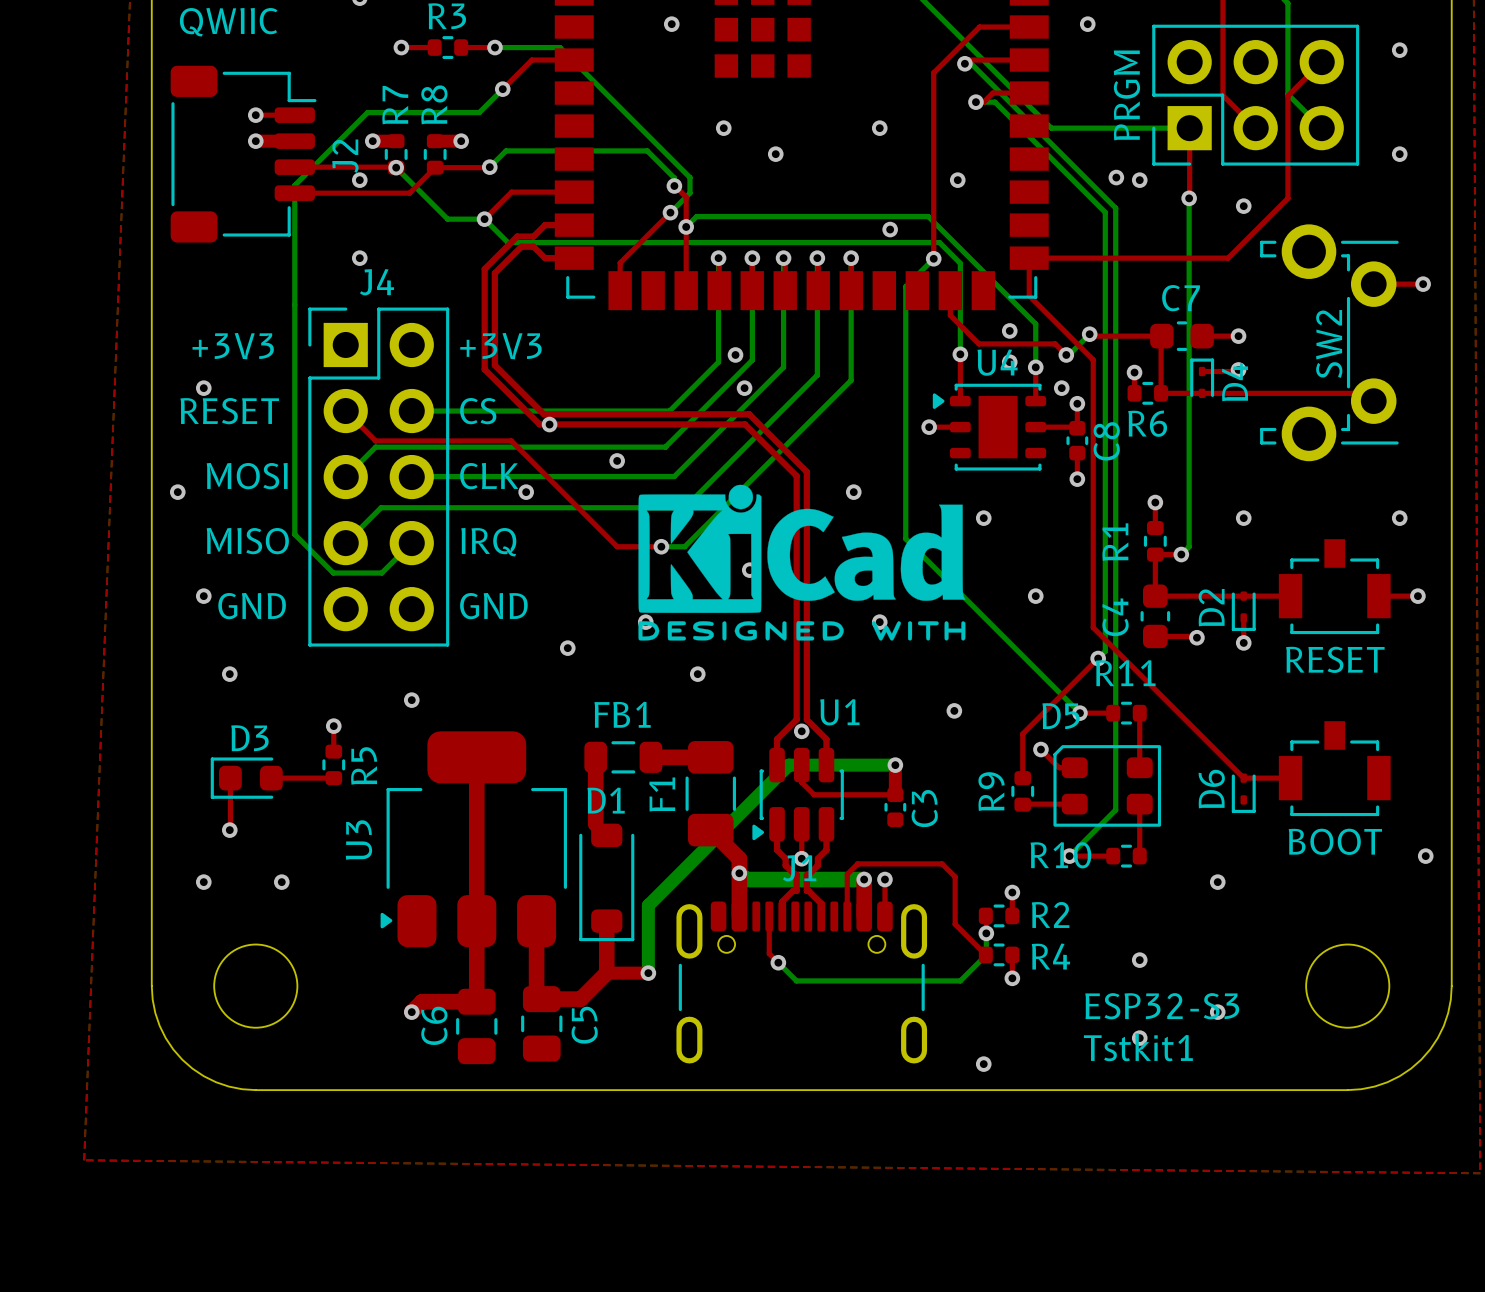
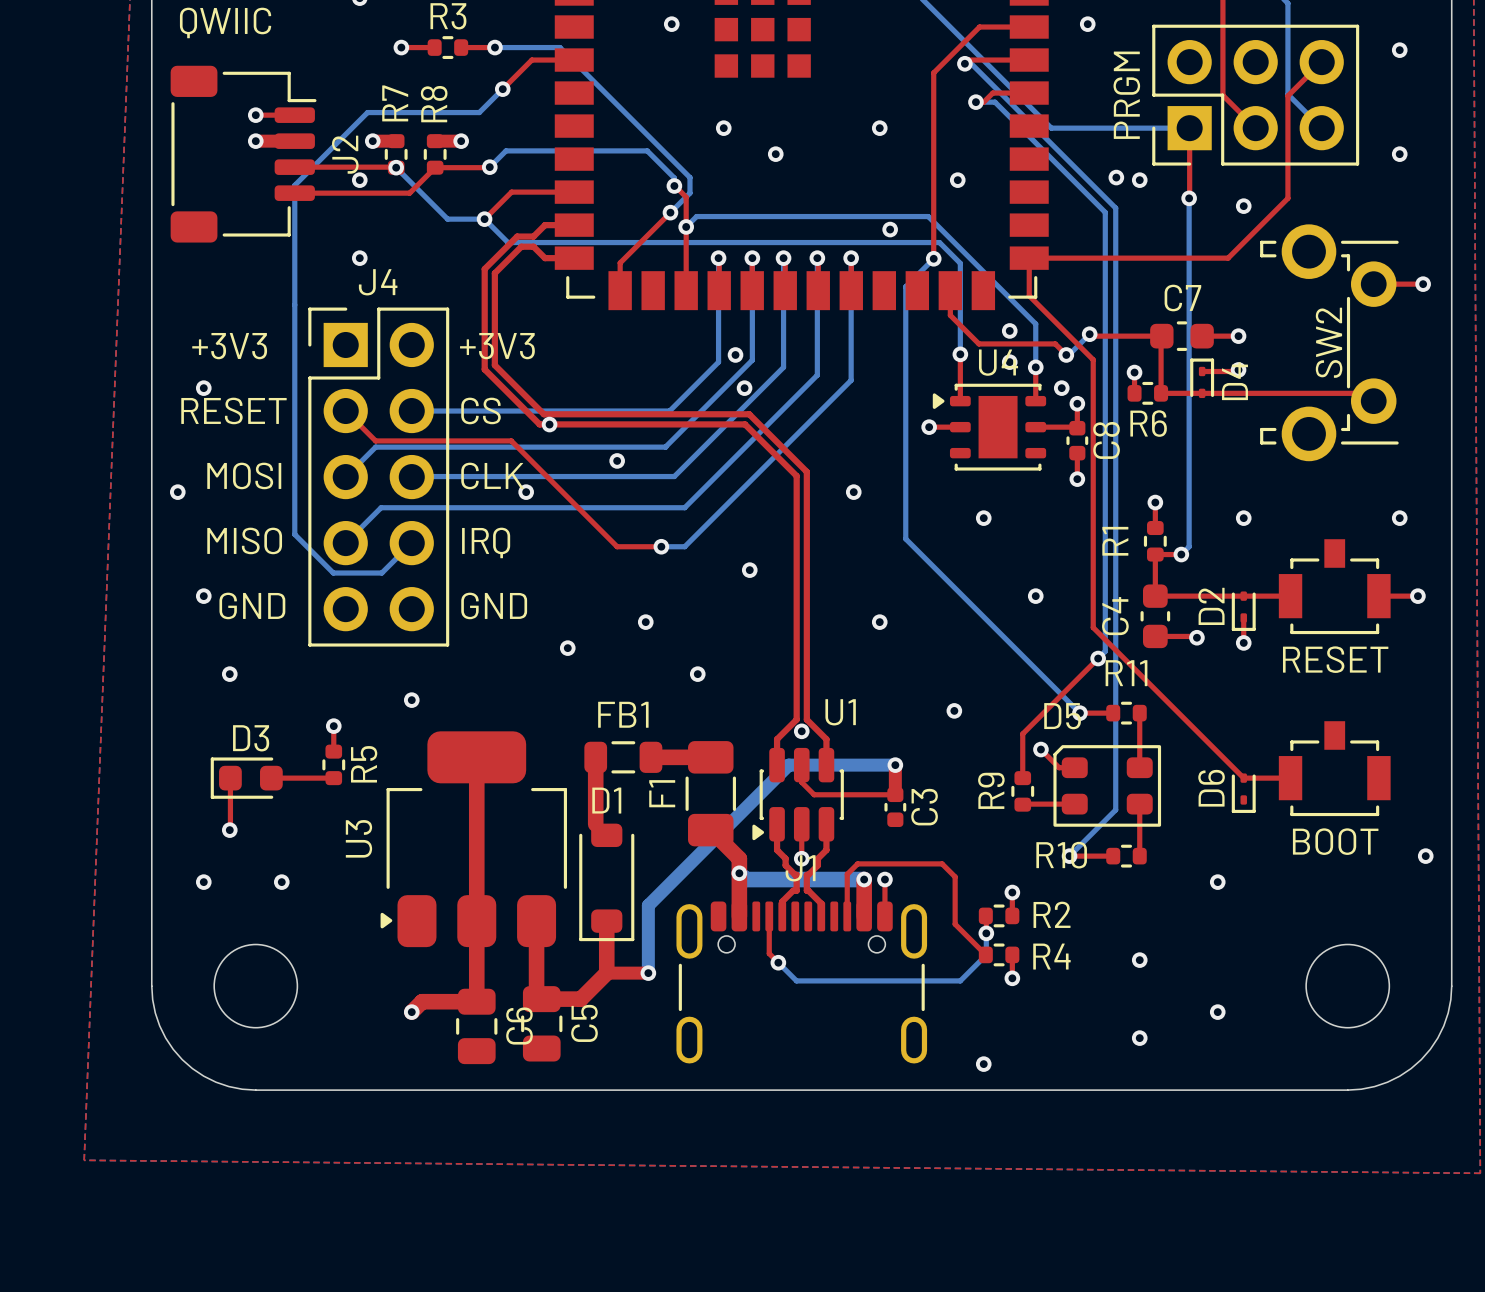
drawing: [638, 484, 966, 641] -> none
text: ESP32-S3 (1162, 1006) -> none
C6 name position: C6 (434, 1025) -> C6 (519, 1026)
text: Tstkit1 (1138, 1047) -> none

